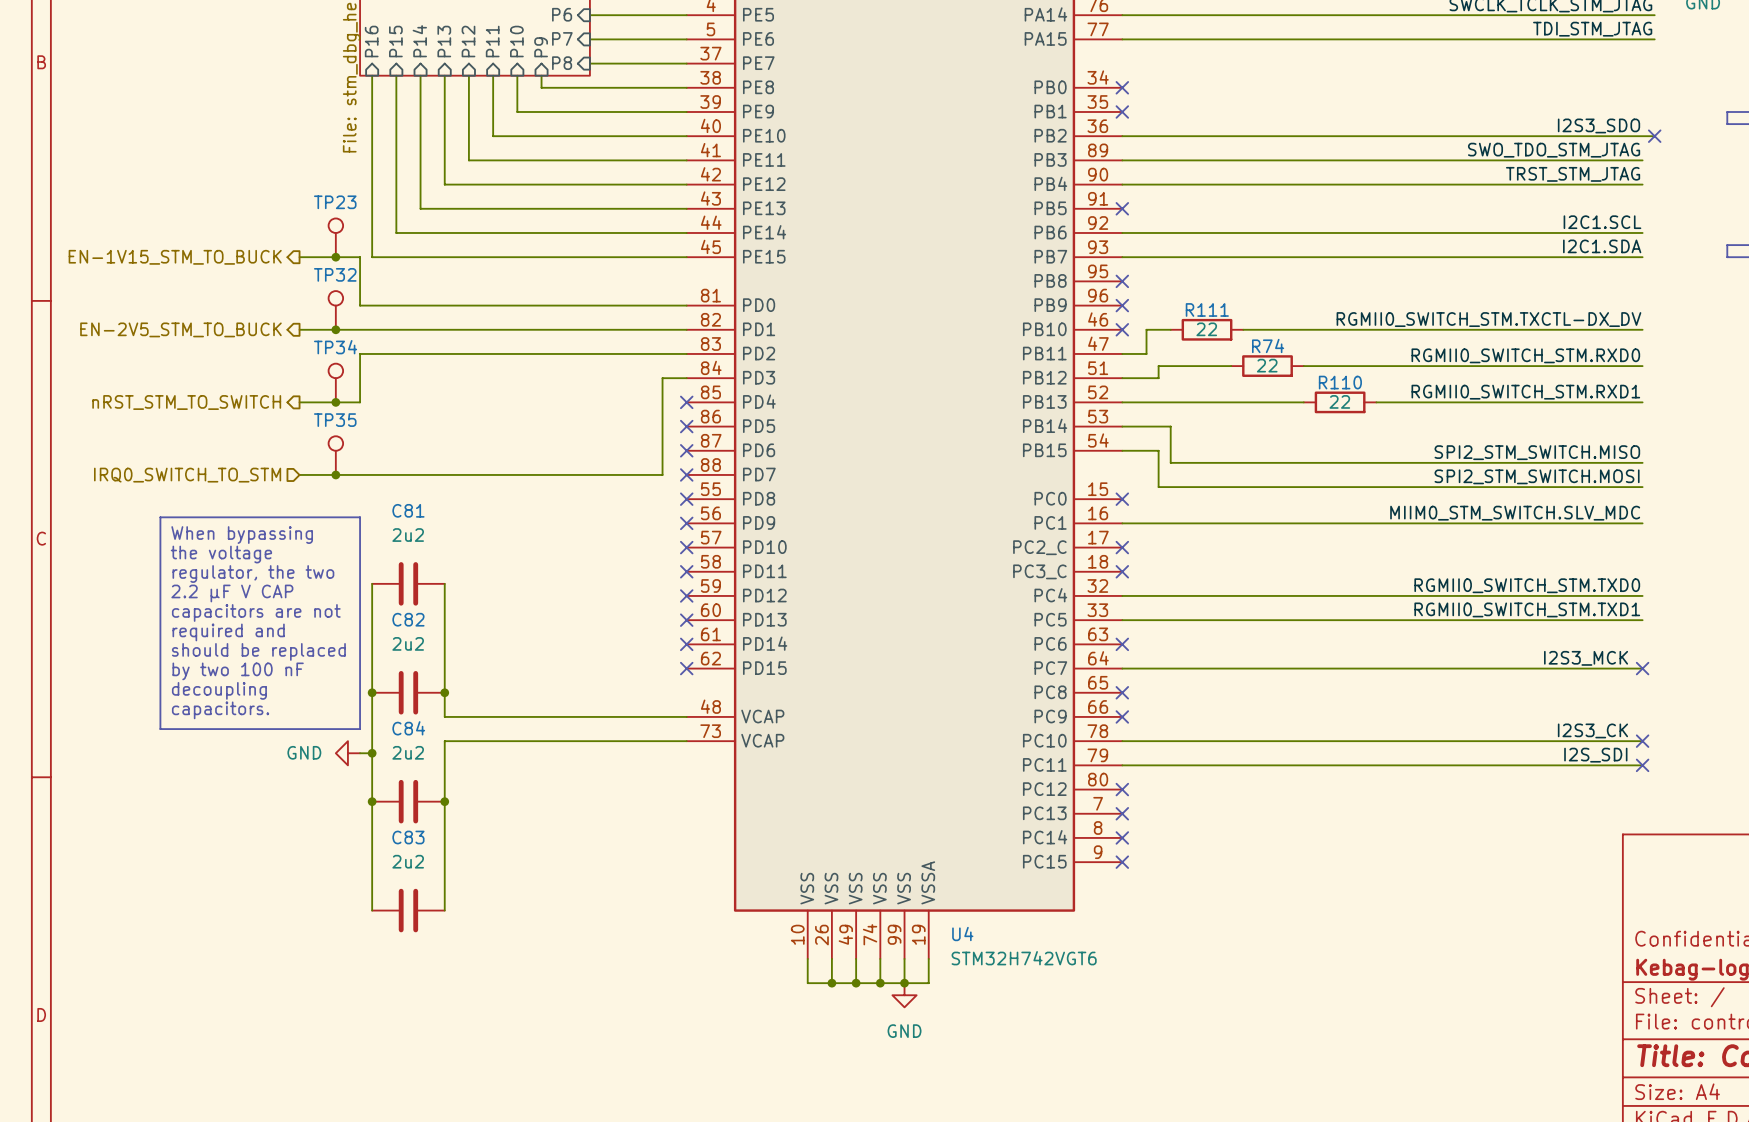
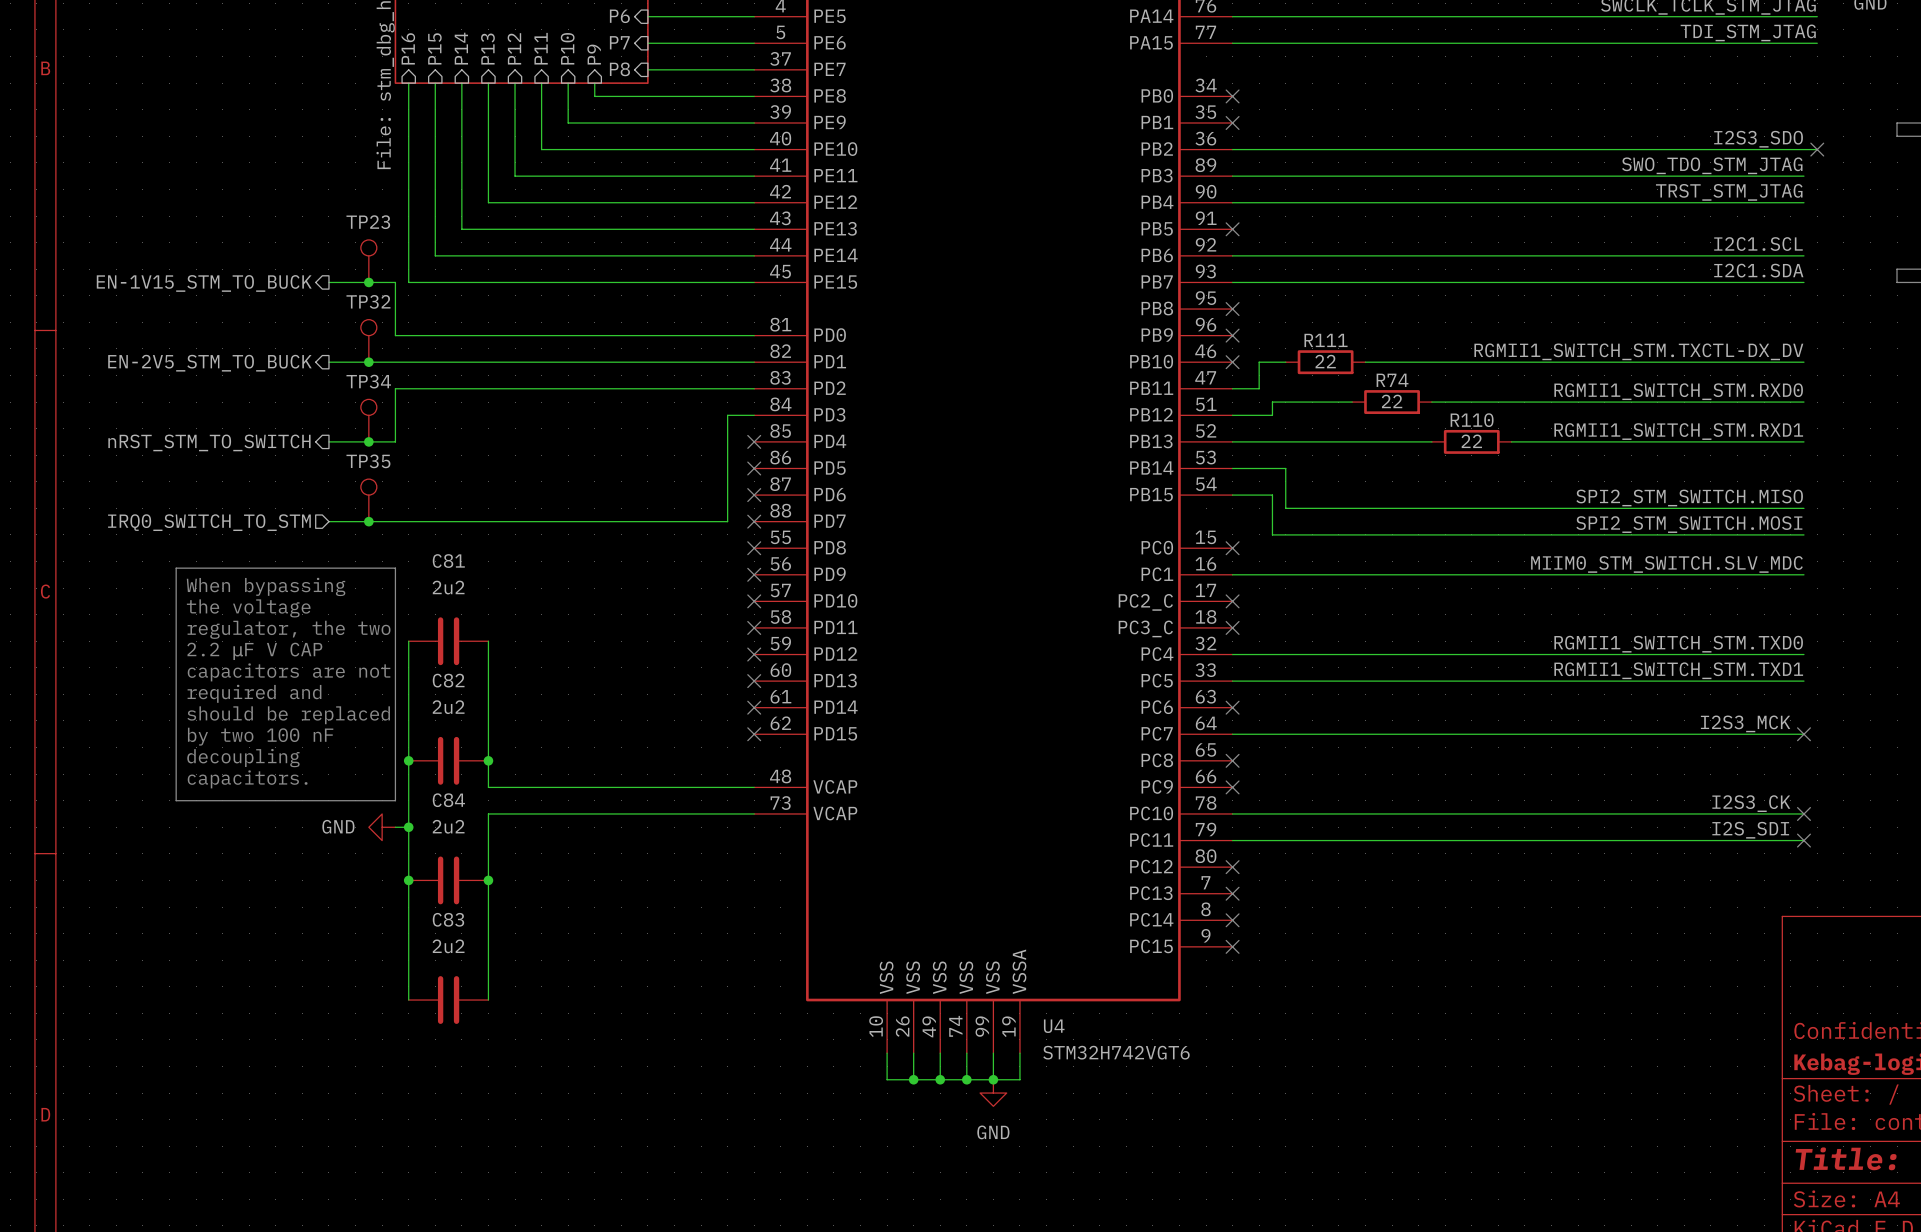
label: RGMII0_SWITCH_STM.TXCTL-DX_DV (1488, 319) -> RGMII1_SWITCH_STM.TXCTL-DX_DV (1638, 351)
label: RGMII0_SWITCH_STM.RXD0 (1525, 355) -> RGMII1_SWITCH_STM.RXD0 (1678, 391)
label: RGMII0_SWITCH_STM.RXD1 (1525, 392) -> RGMII1_SWITCH_STM.RXD1 (1678, 431)
label: RGMII0_SWITCH_STM.TXD0 (1527, 585) -> RGMII1_SWITCH_STM.TXD0 (1678, 644)
label: RGMII0_SWITCH_STM.TXD1 (1527, 609) -> RGMII1_SWITCH_STM.TXD1 (1678, 670)

